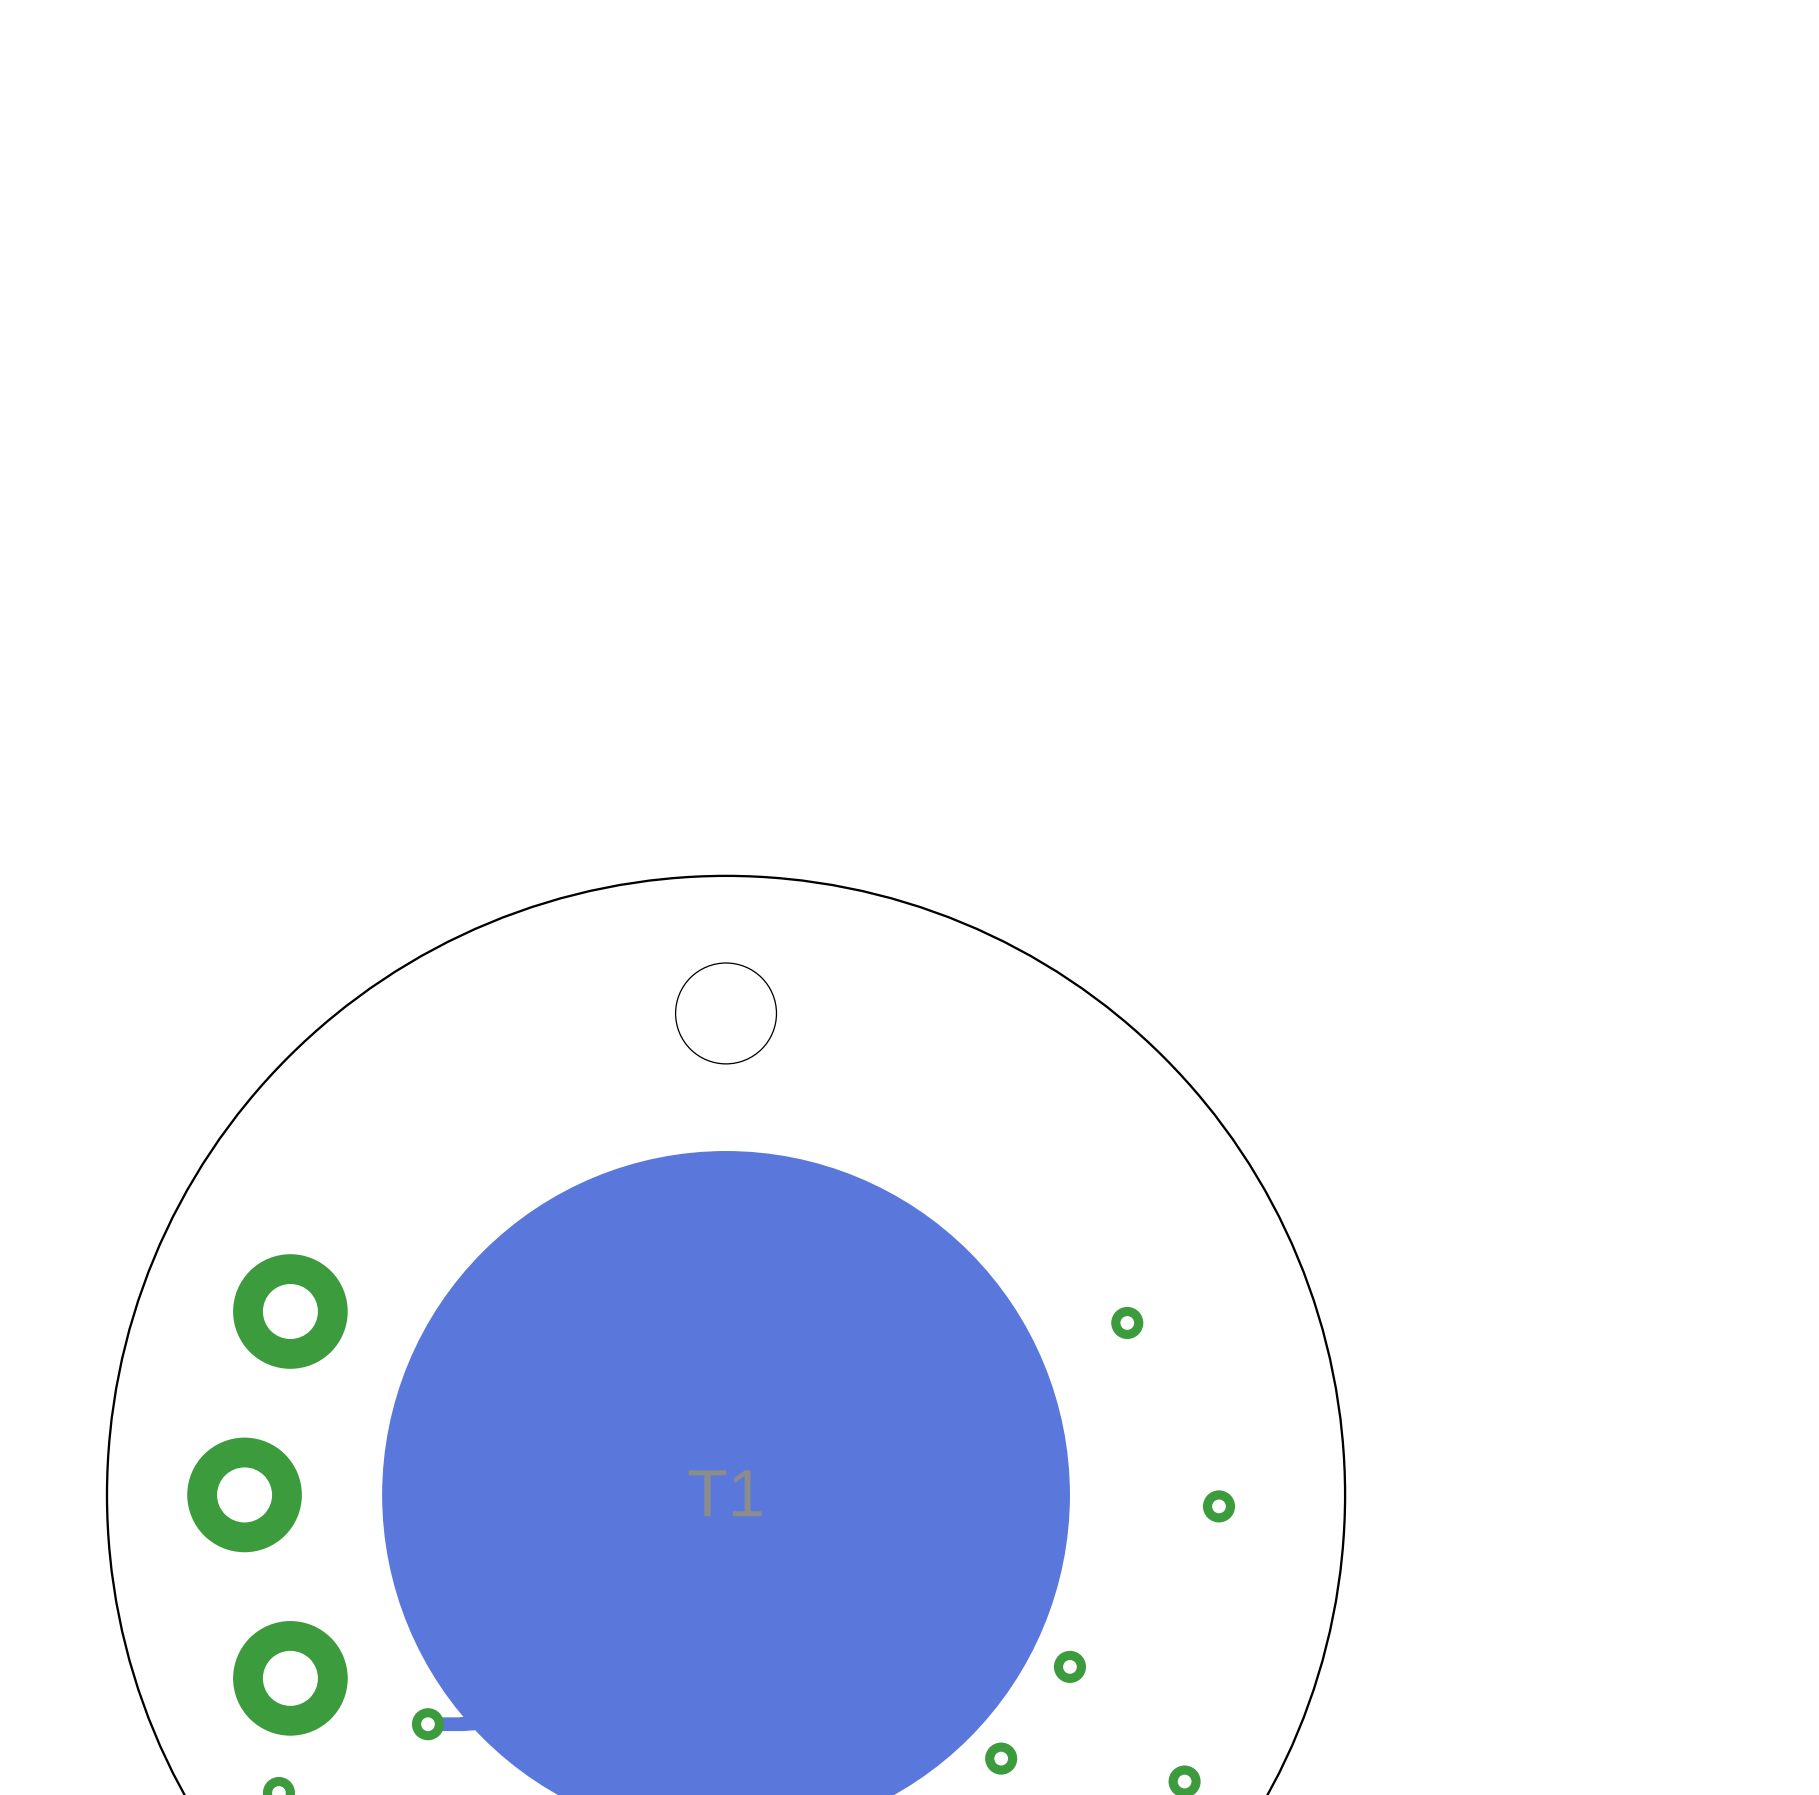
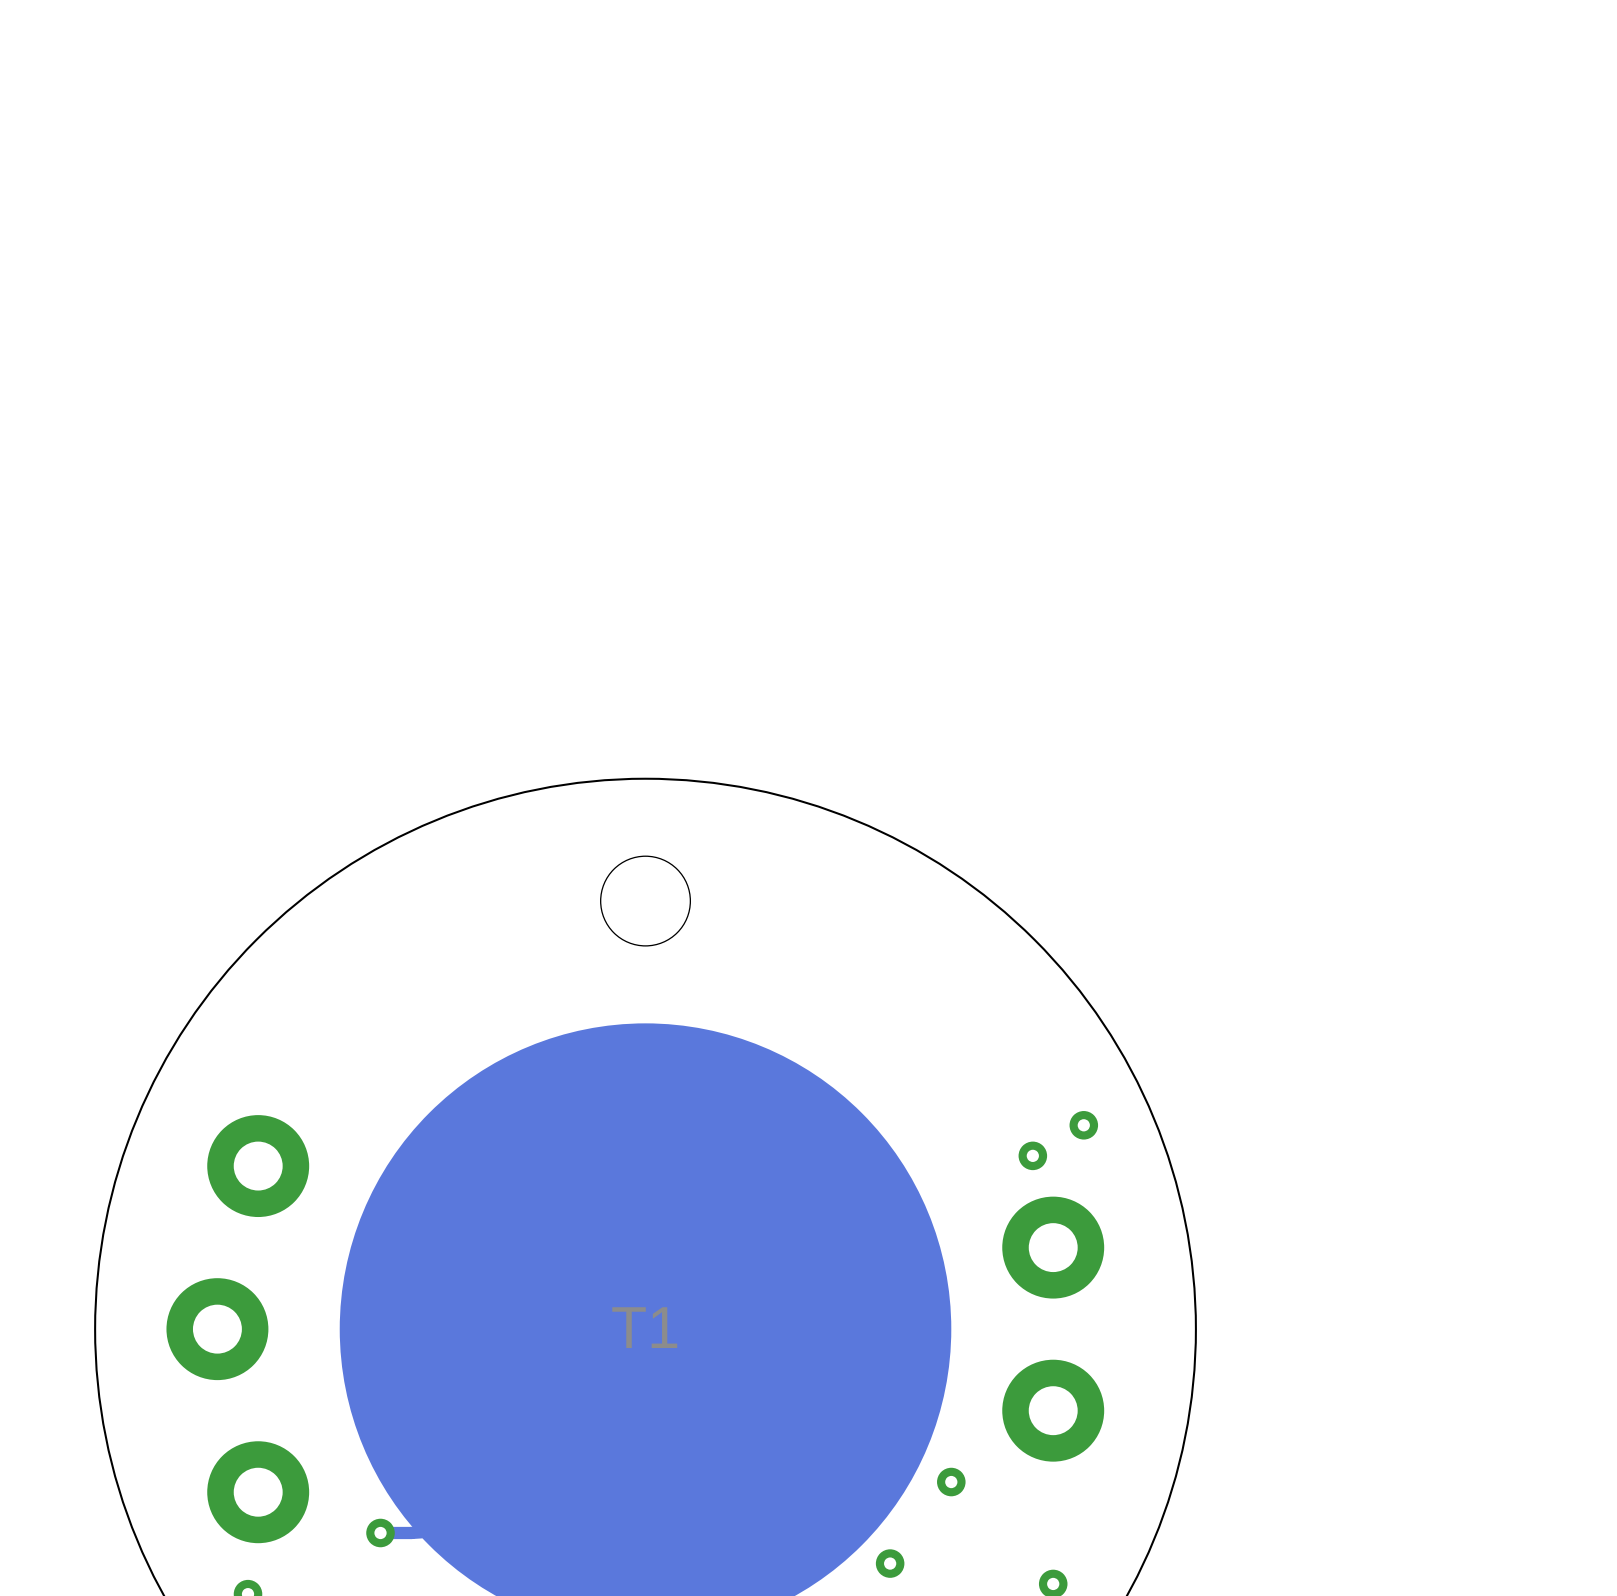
via: none -> (1083, 1125)
via position: (1127, 1322) -> (1032, 1155)
part: none -> (1053, 1247)
via: (1218, 1506) -> none
part: none -> (1053, 1410)

